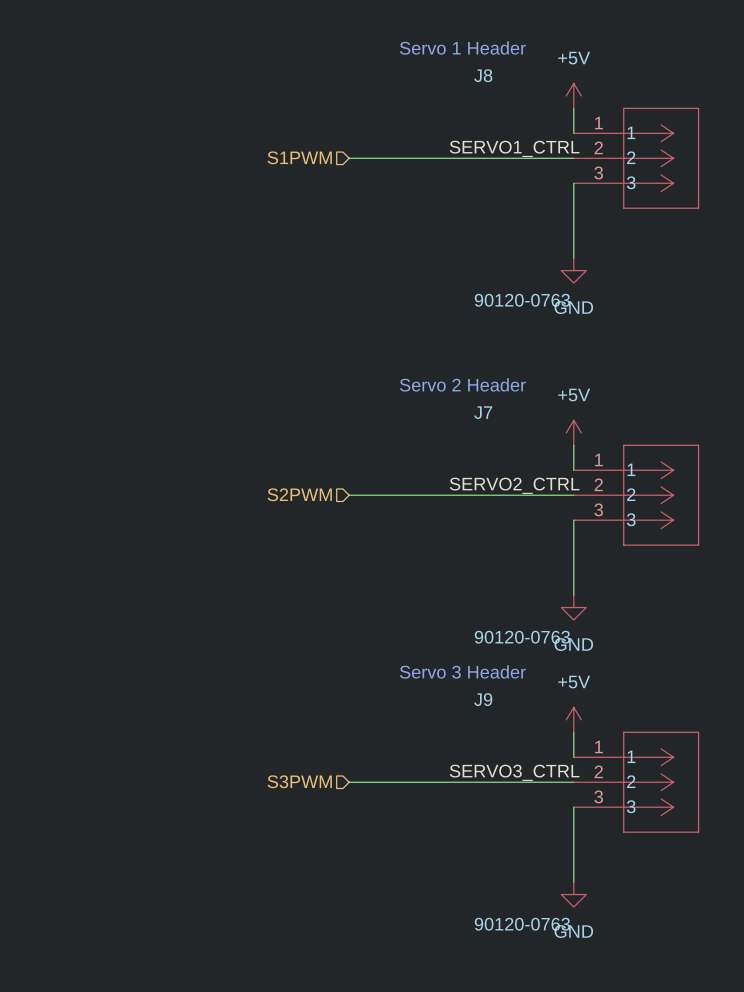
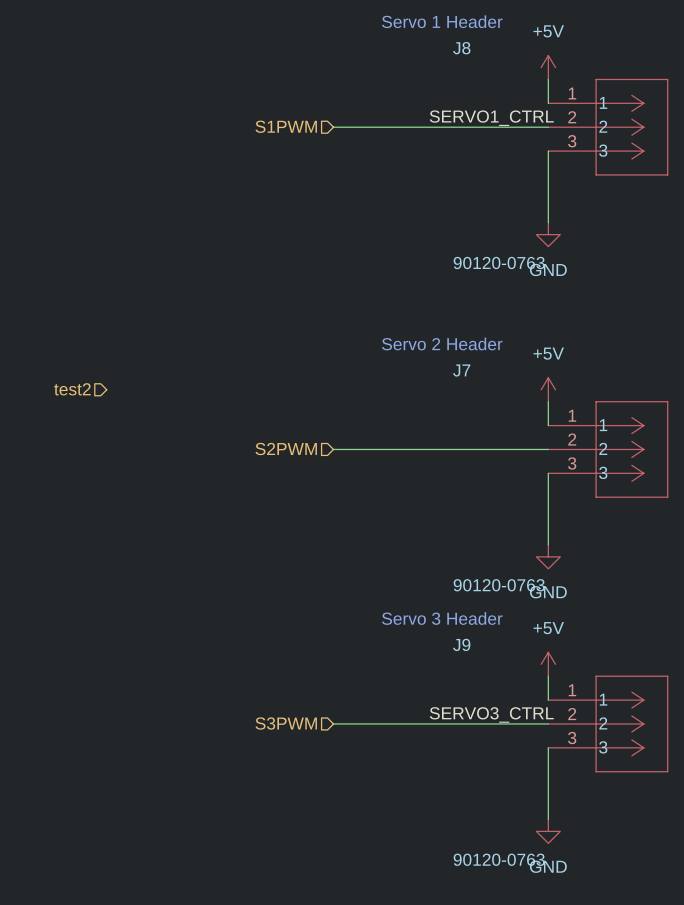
hierarchical label: none -> test2 (72, 389)
label: SERVO2_CTRL (514, 485) -> none

